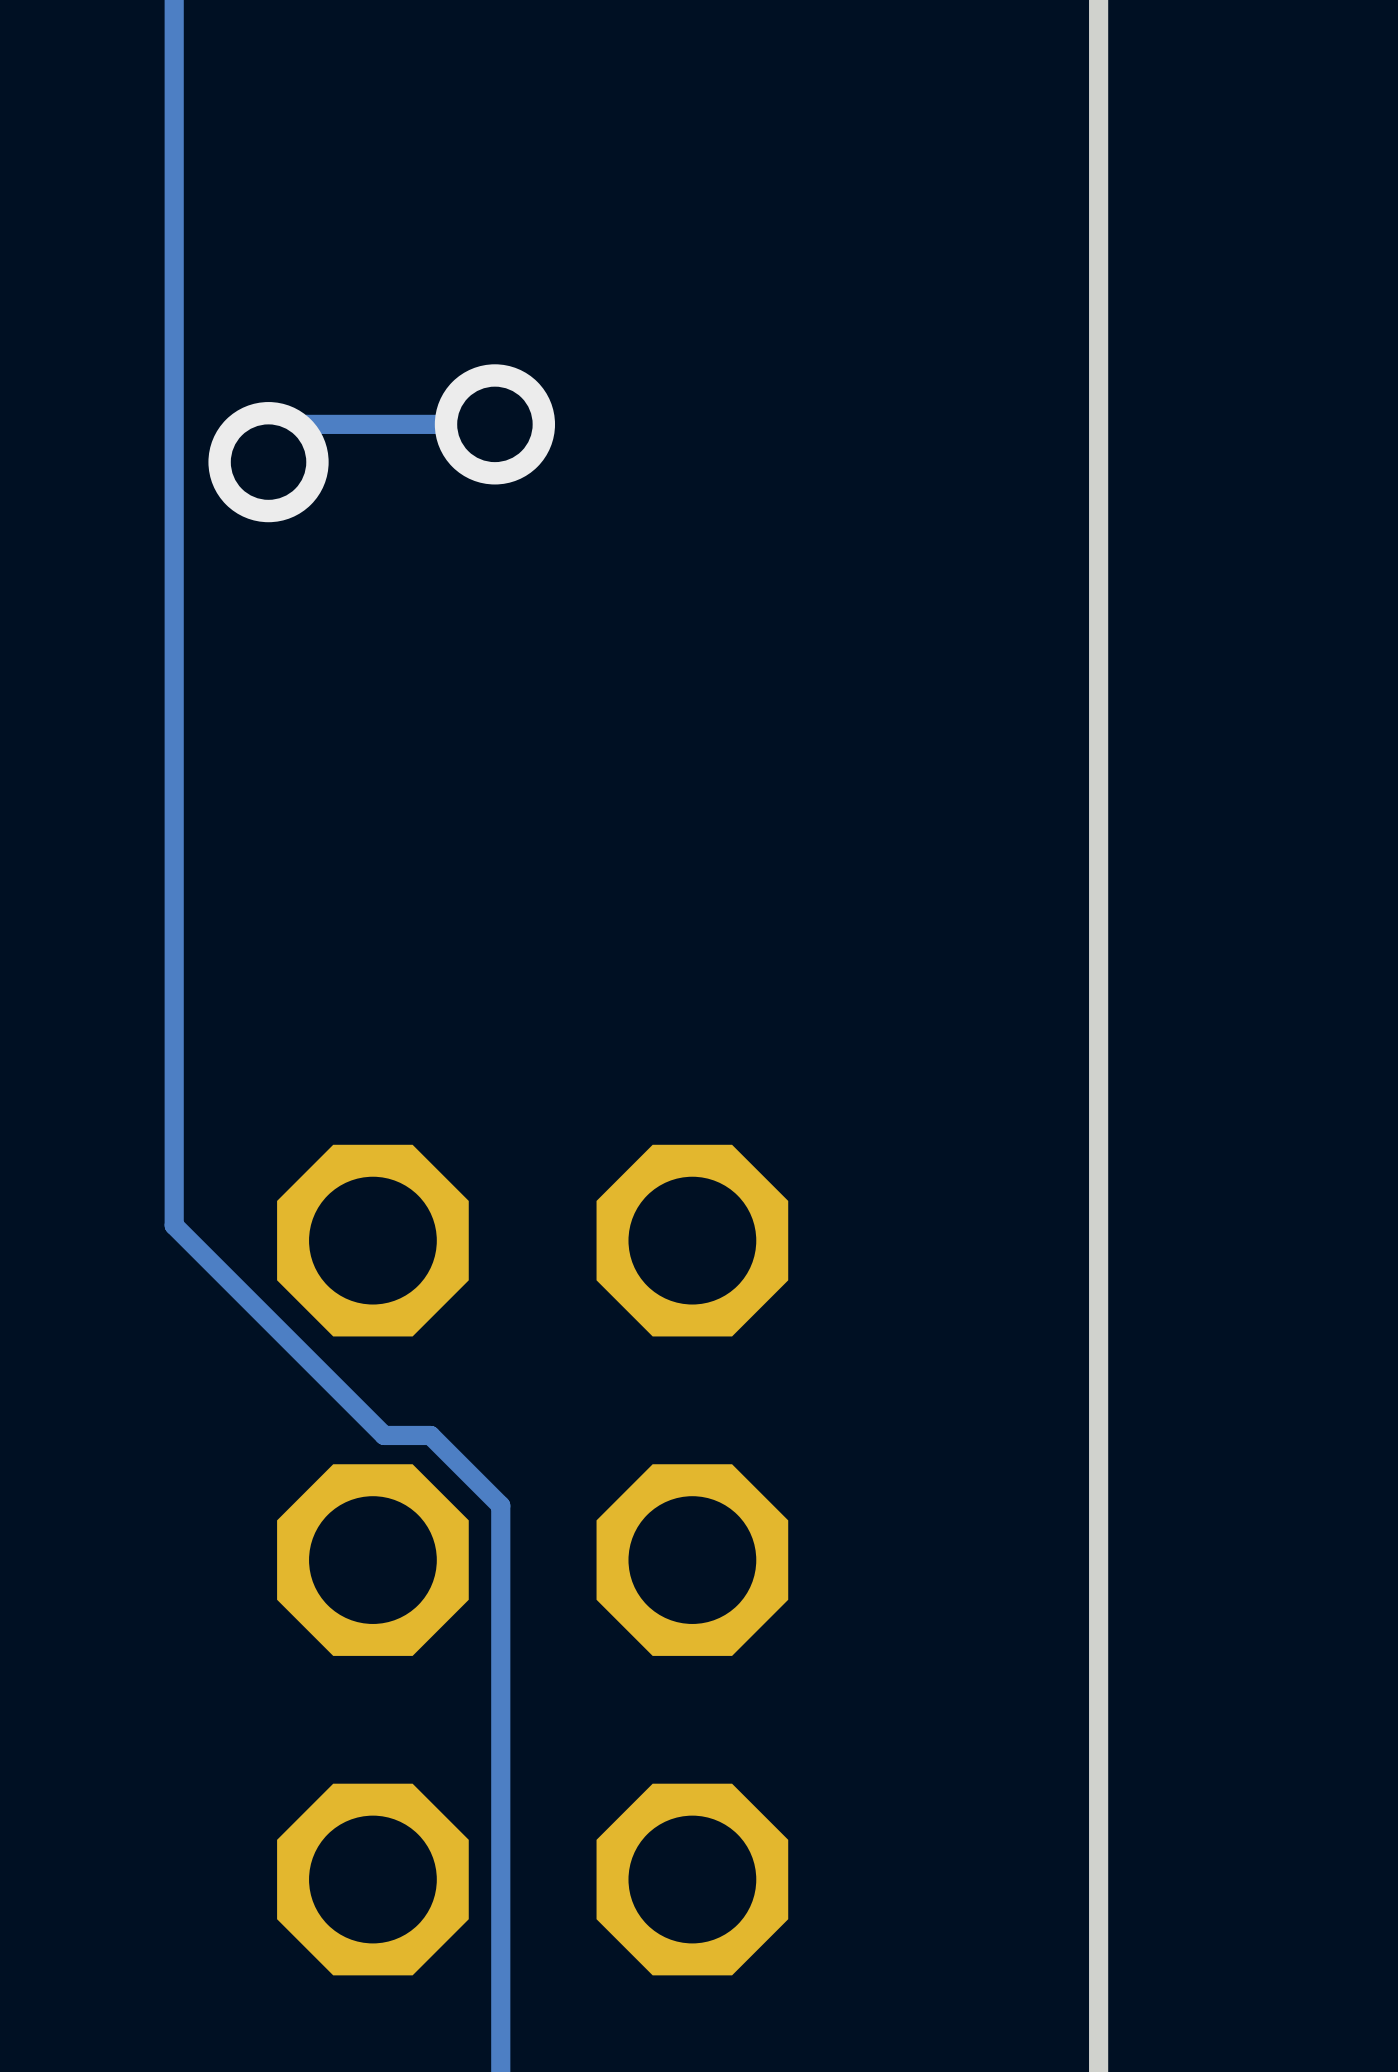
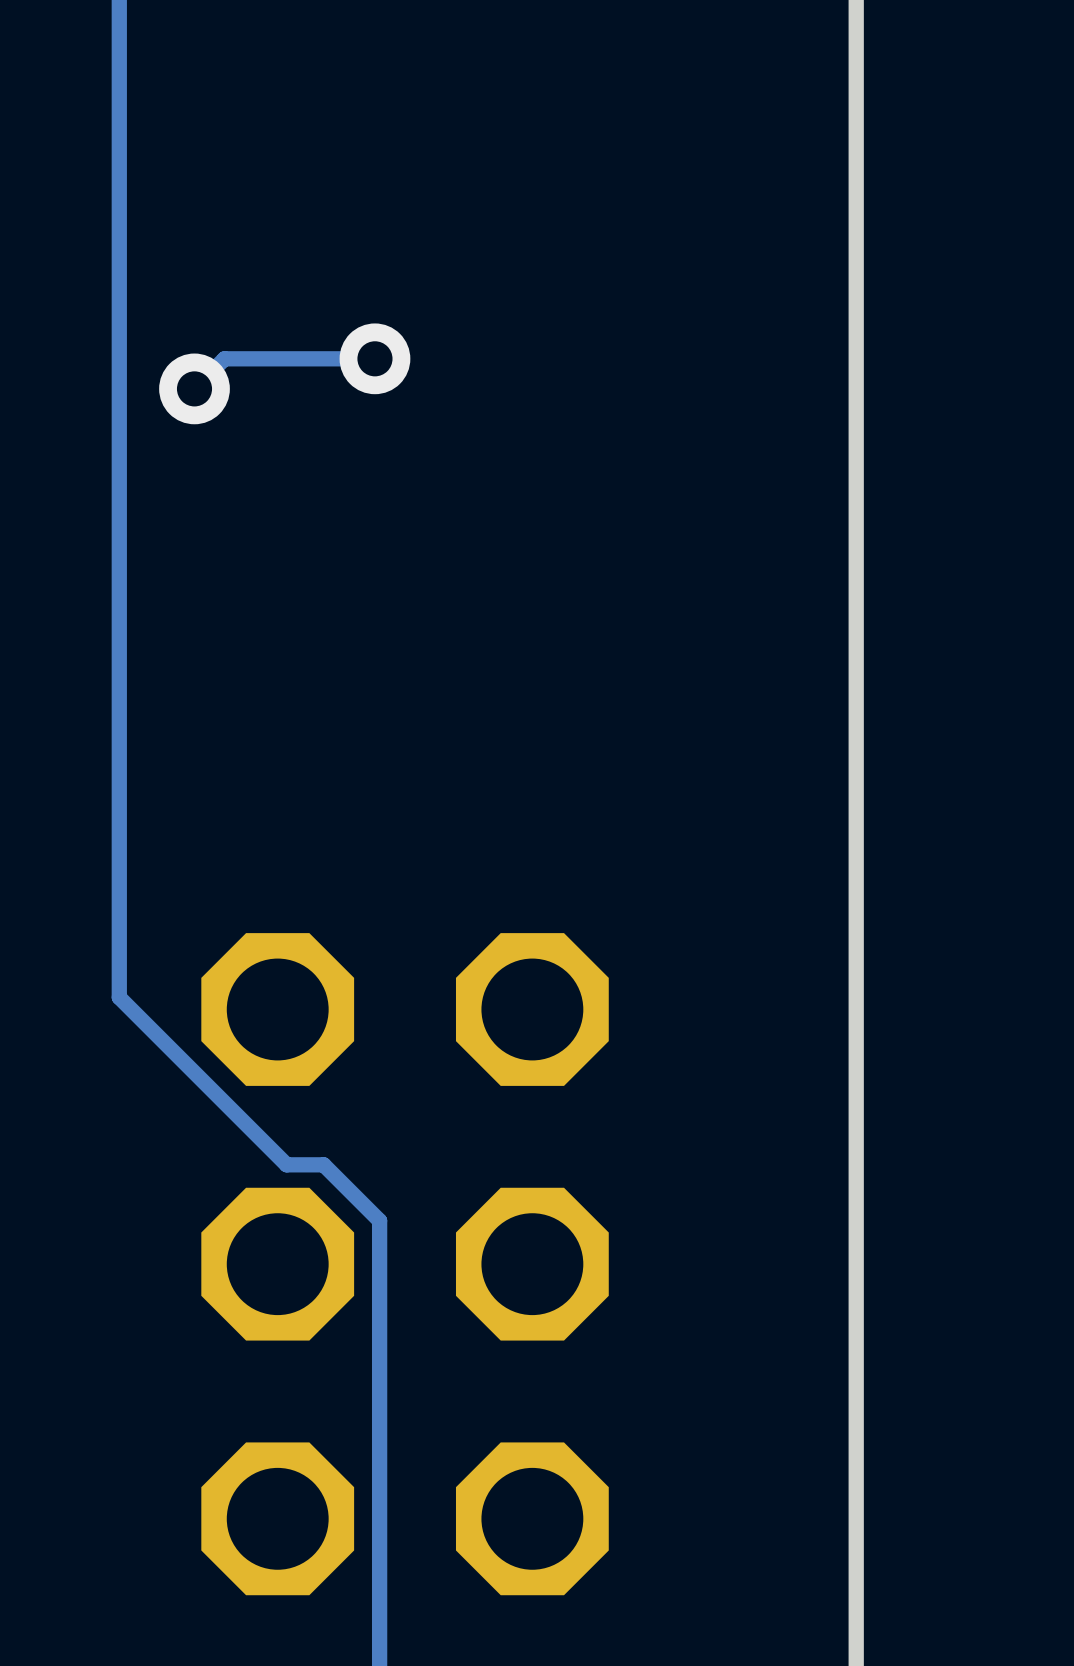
via size: [434, 364, 556, 485] -> [339, 323, 411, 395]
via size: [208, 402, 329, 523] -> [159, 353, 230, 425]

